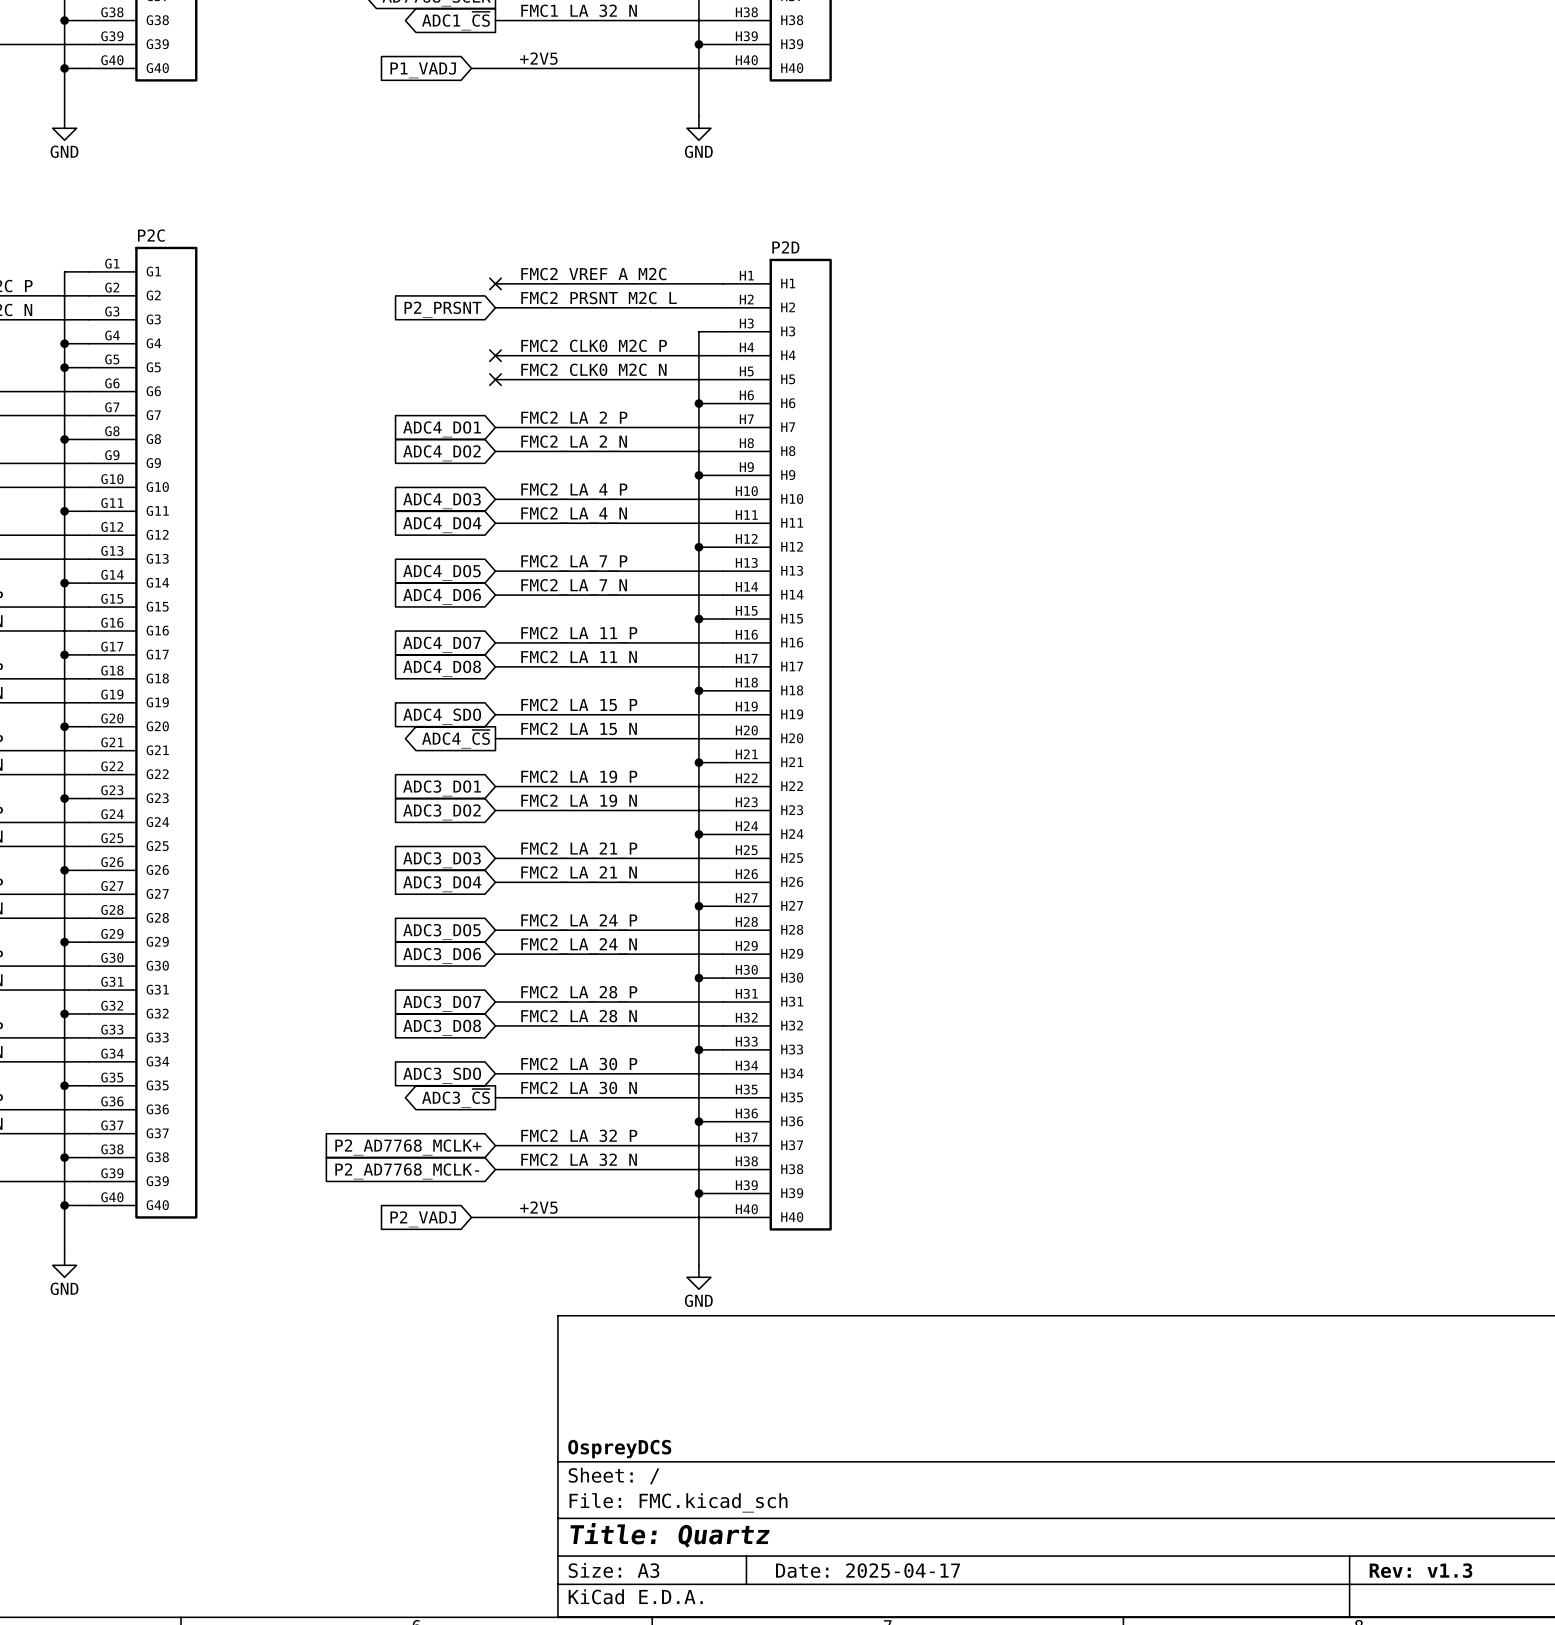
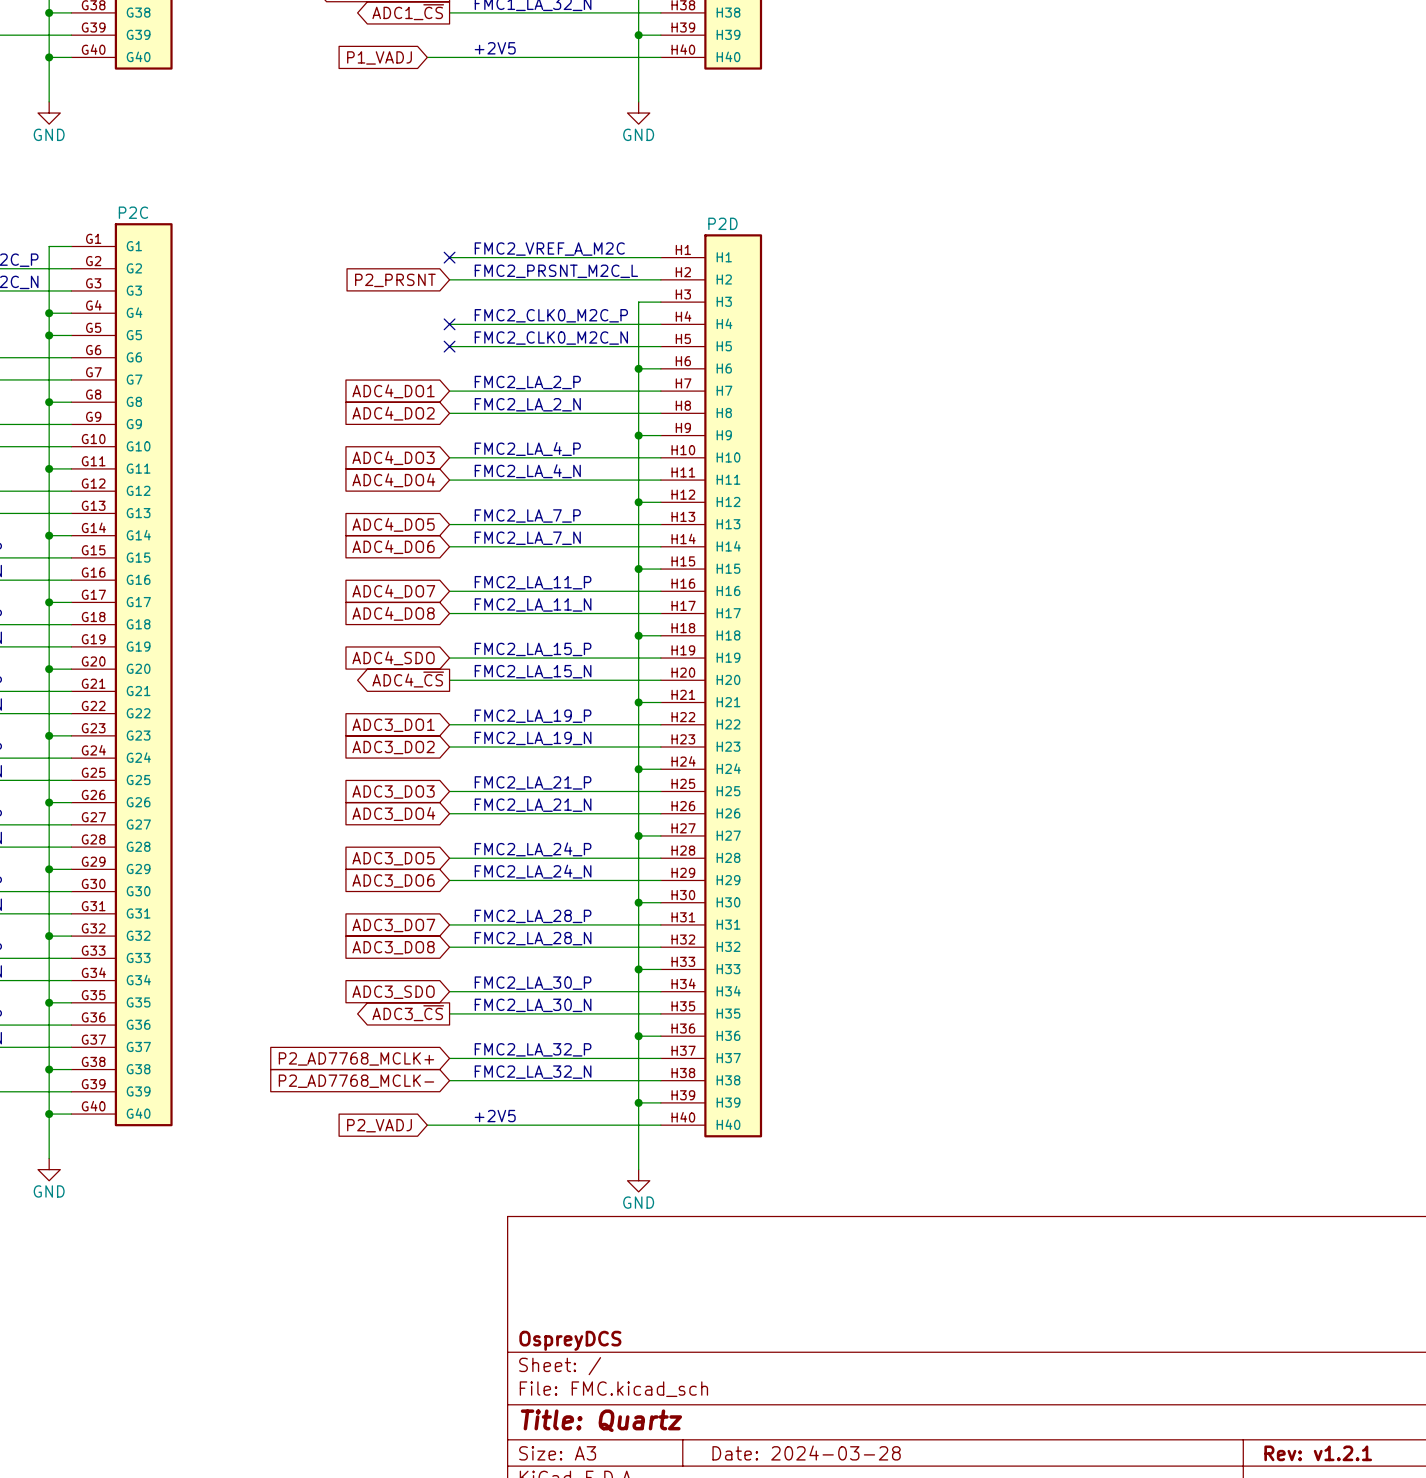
title block: Date: 2025-04-17 (868, 1570) -> Date: 2024-03-28 (806, 1453)
title block: Rev: v1.3 (1420, 1570) -> Rev: v1.2.1 (1318, 1453)

